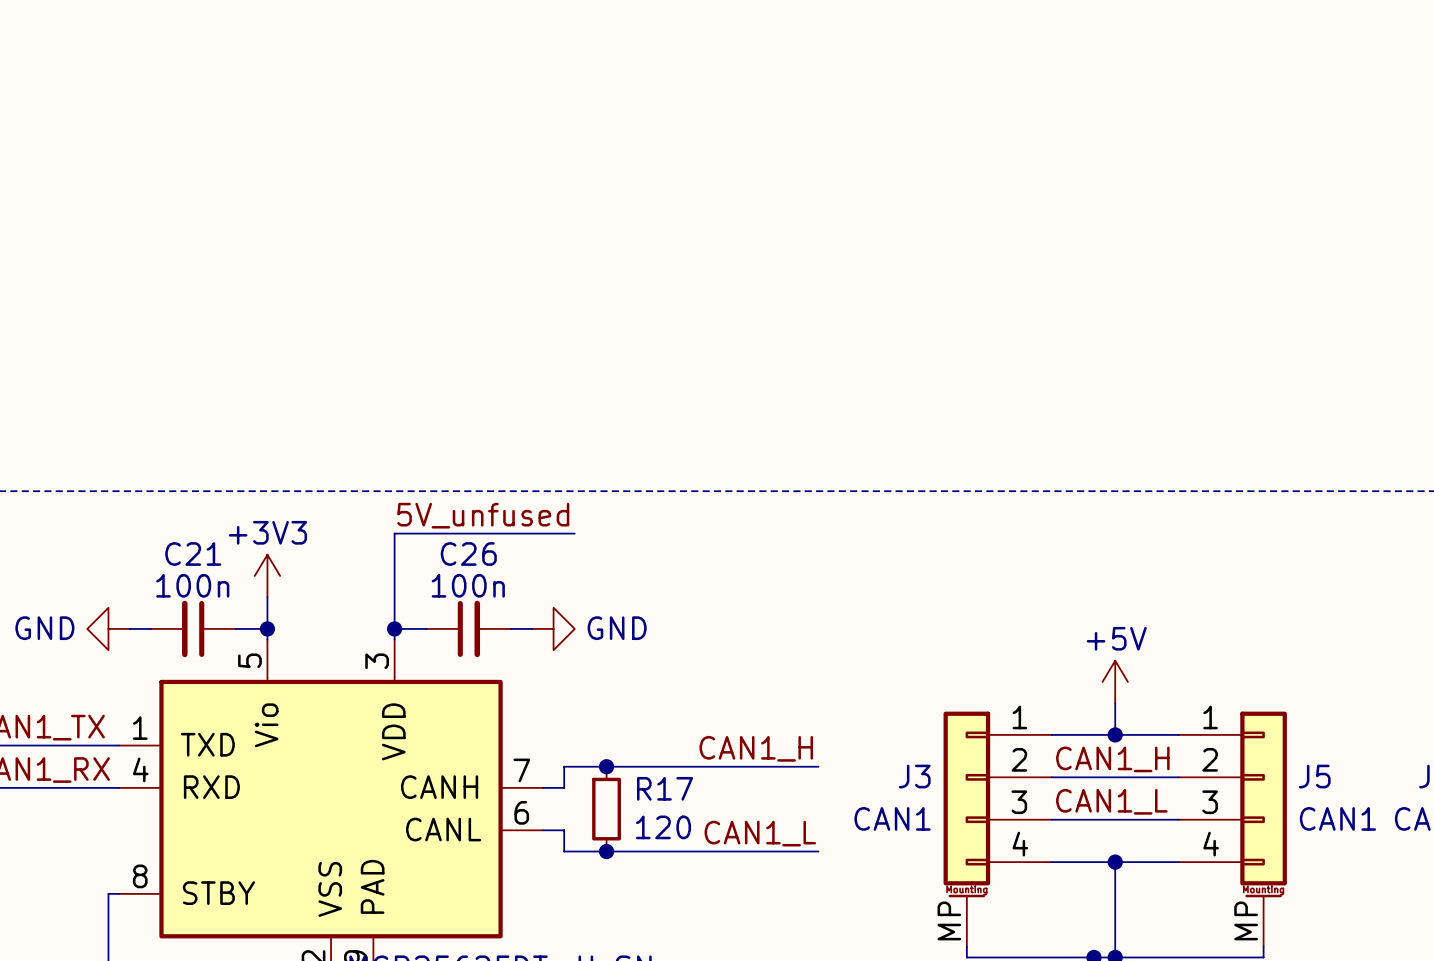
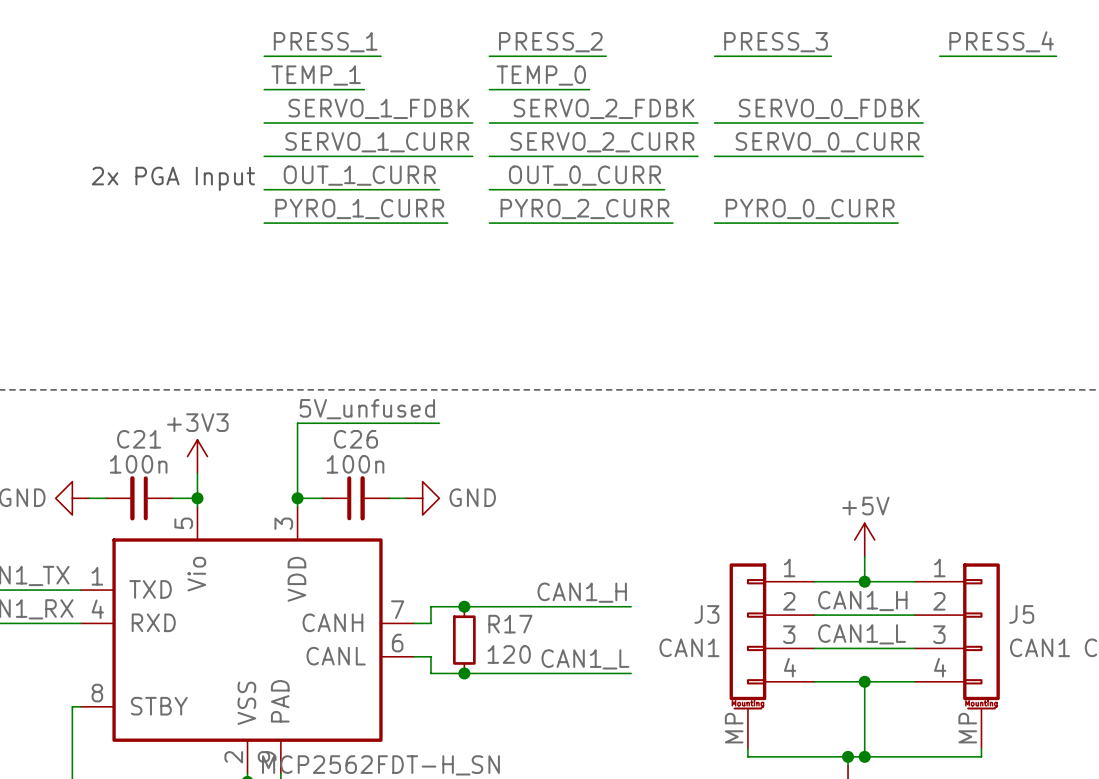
label: none -> PRESS_4 (1001, 41)
label: none -> PRESS_1 (325, 42)
label: none -> PRESS_2 (550, 42)
label: none -> PRESS_3 (776, 42)
wire: none -> (264, 56) (380, 56)
wire: none -> (489, 56) (606, 56)
wire: none -> (714, 56) (831, 56)
wire: none -> (939, 56) (1056, 56)
label: none -> TEMP_1 (316, 75)
label: none -> TEMP_0 (541, 75)
wire: none -> (264, 89) (364, 89)
wire: none -> (489, 89) (589, 89)
label: none -> SERVO_1_FDBK (378, 108)
label: none -> SERVO_2_FDBK (604, 108)
label: none -> SERVO_0_FDBK (829, 108)
wire: none -> (264, 122) (472, 122)
wire: none -> (489, 122) (697, 122)
wire: none -> (714, 122) (923, 122)
label: none -> SERVO_1_CURR (377, 142)
label: none -> SERVO_2_CURR (602, 142)
label: none -> SERVO_0_CURR (827, 142)
wire: none -> (264, 156) (472, 156)
wire: none -> (489, 156) (697, 156)
wire: none -> (714, 156) (923, 156)
label: none -> OUT_1_CURR (359, 175)
label: none -> OUT_0_CURR (584, 175)
text: none -> 2x PGA Input (173, 178)
wire: none -> (264, 189) (439, 189)
wire: none -> (489, 189) (664, 189)
label: none -> PYRO_1_CURR (359, 208)
label: none -> PYRO_2_CURR (584, 208)
label: none -> PYRO_0_CURR (810, 208)
wire: none -> (264, 223) (447, 223)
wire: none -> (489, 223) (672, 223)
wire: none -> (714, 223) (898, 223)

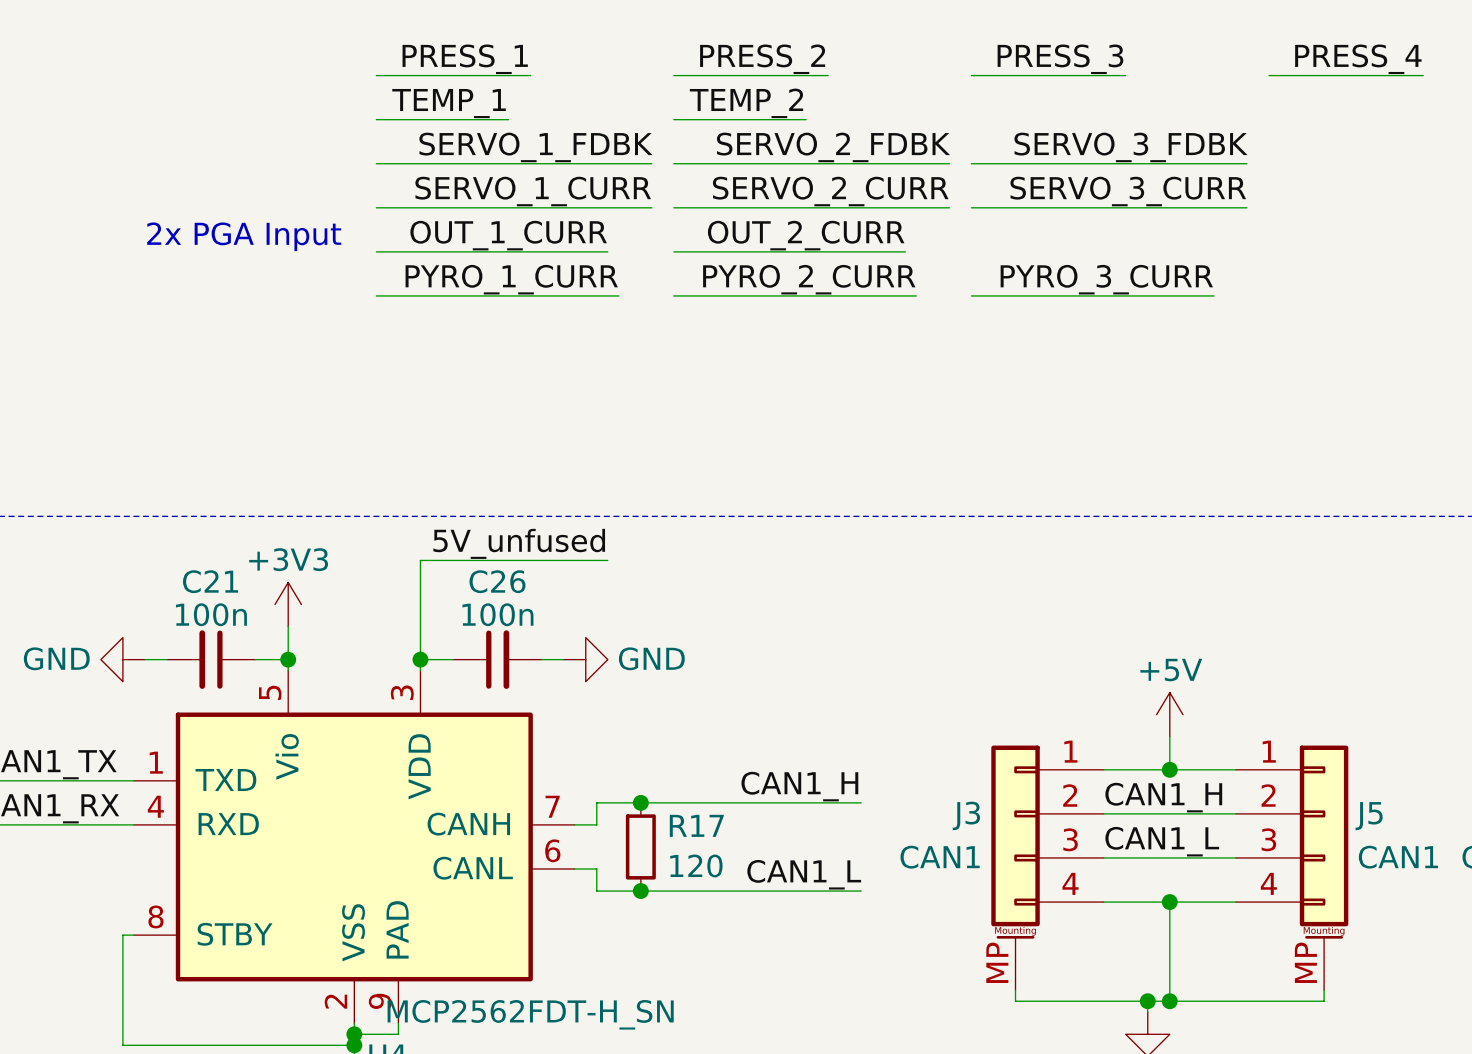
label: TEMP_0 (541, 75) -> TEMP_2 (746, 103)
label: SERVO_0_FDBK (829, 108) -> SERVO_3_FDBK (1131, 147)
label: SERVO_0_CURR (827, 142) -> SERVO_3_CURR (1128, 191)
label: OUT_0_CURR (584, 175) -> OUT_2_CURR (806, 235)
label: PYRO_0_CURR (810, 208) -> PYRO_3_CURR (1106, 279)

